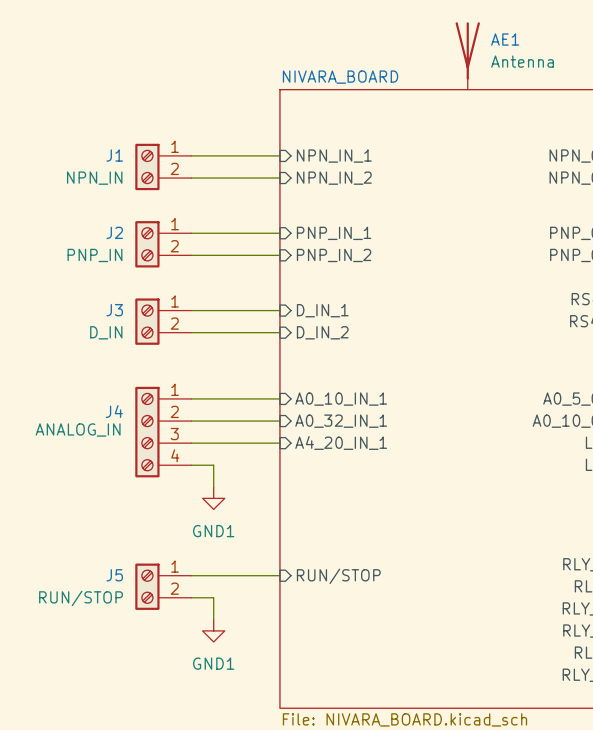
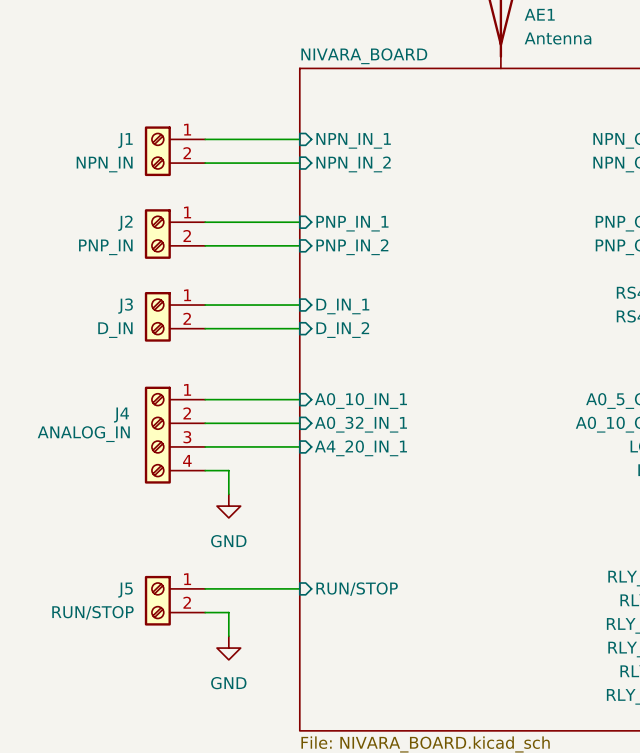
power symbol: GND1 (213, 498) -> GND (228, 506)
power symbol: GND1 (213, 630) -> GND (228, 648)

